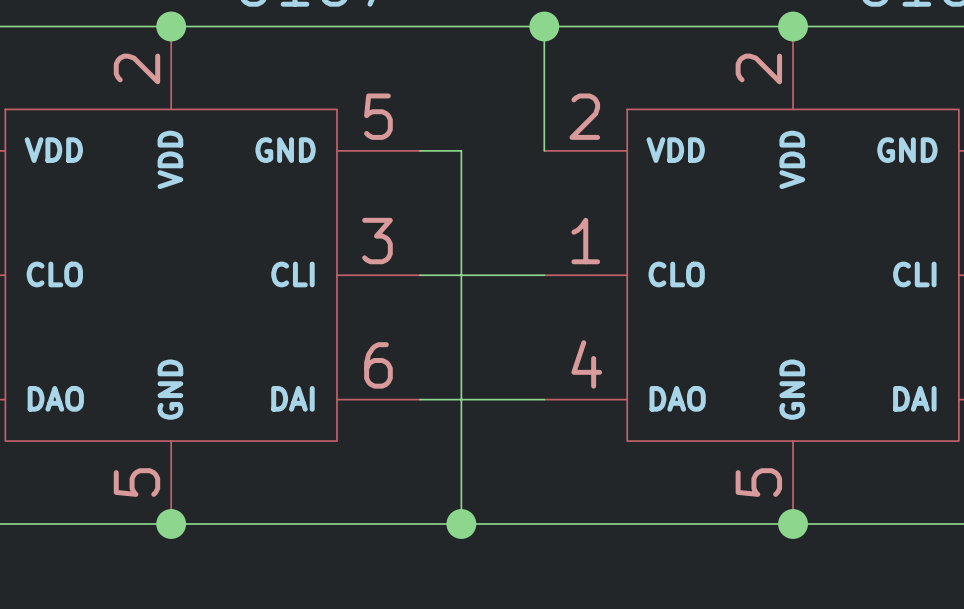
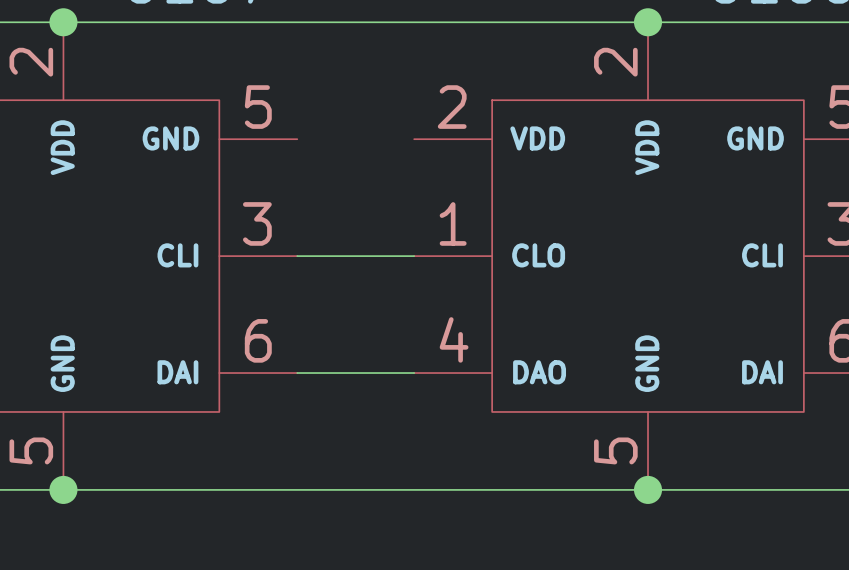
wire: (544, 26) (544, 150) -> none
junction: (544, 26) -> none
wire: (419, 150) (461, 150) (461, 523) -> none
junction: (461, 523) -> none

